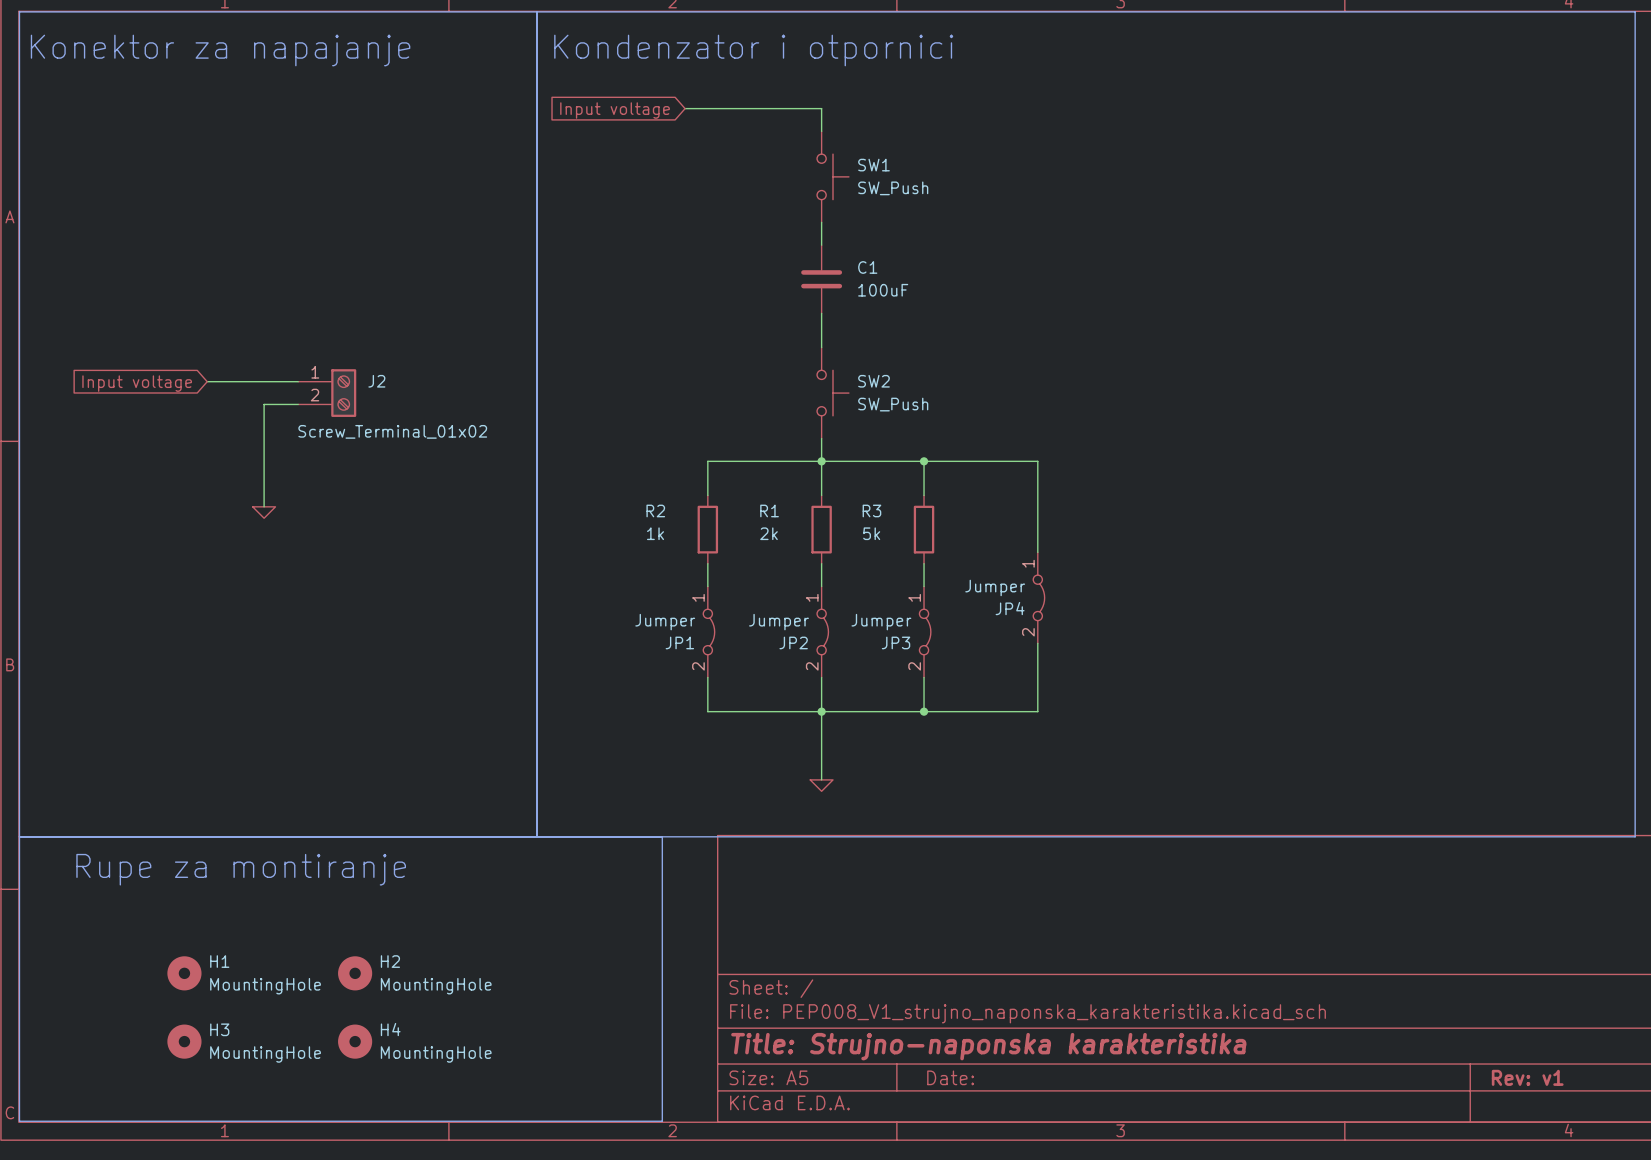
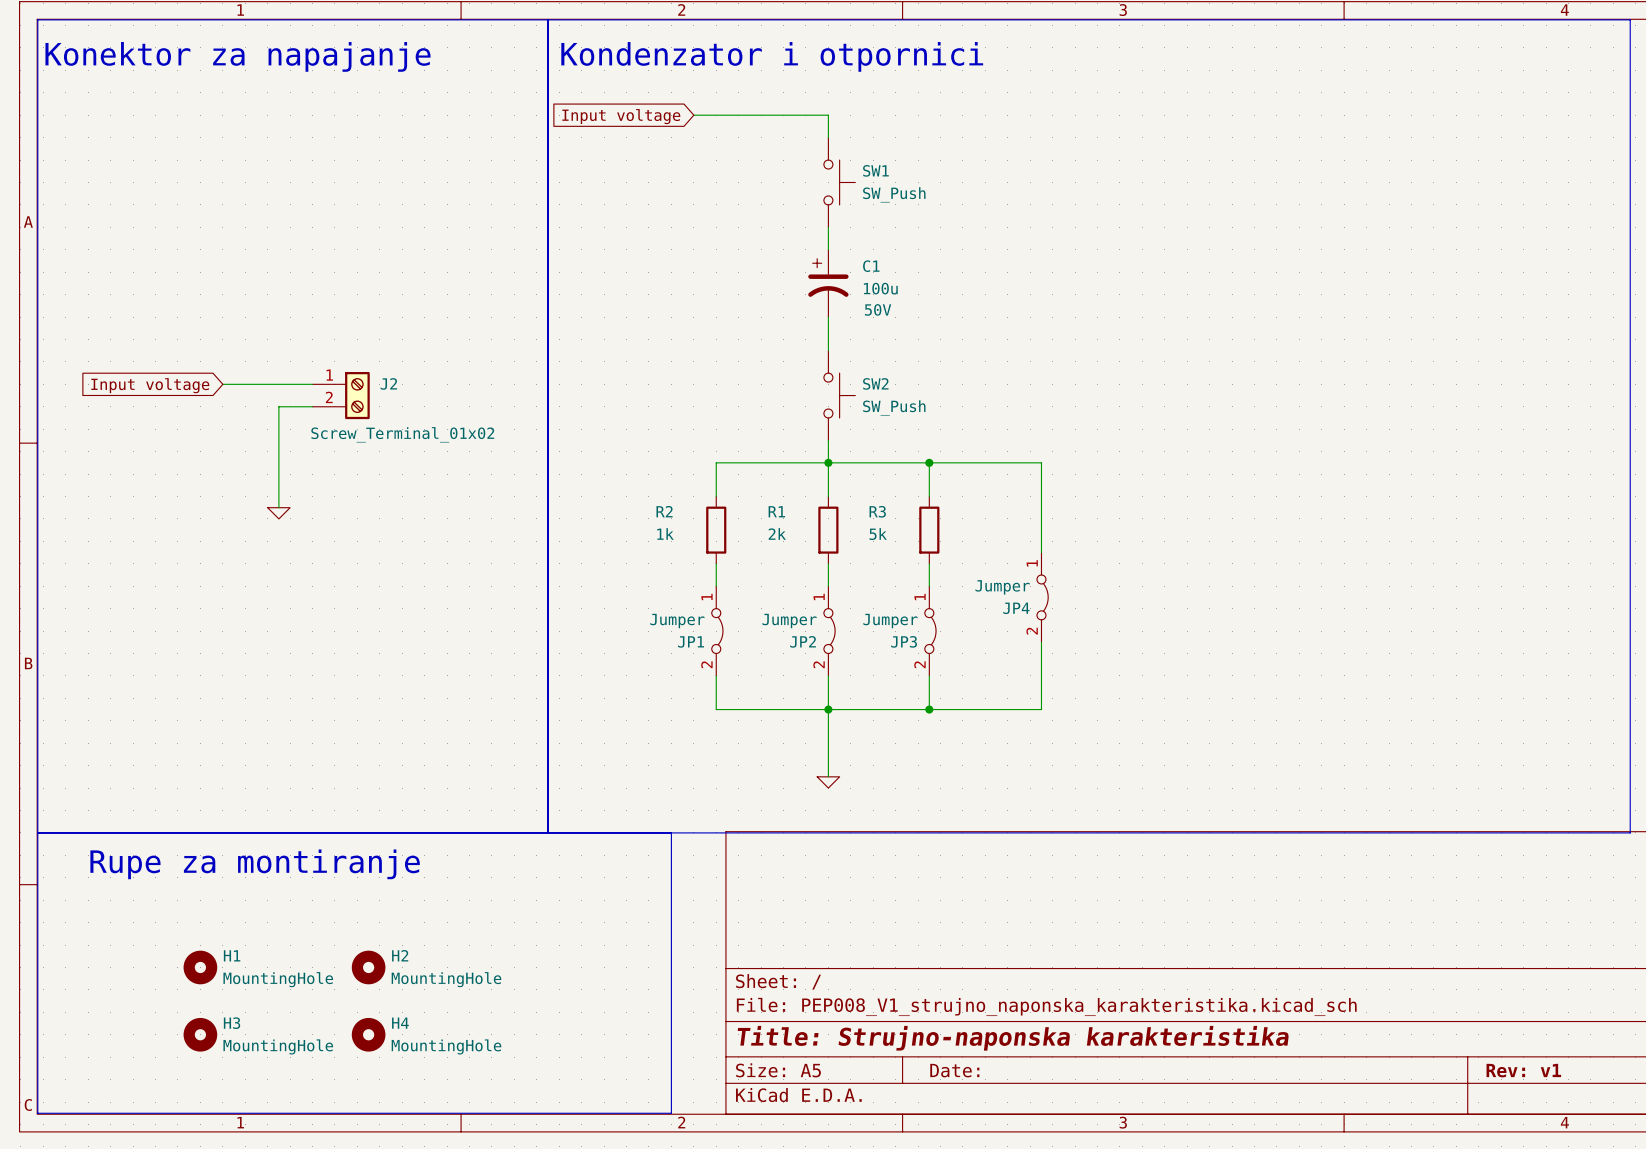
C1 symbol: [801, 245, 843, 314] -> [808, 249, 849, 318]
C1 value: 100uF (883, 290) -> 100u (880, 288)
C1 text: none -> 50V (878, 309)

